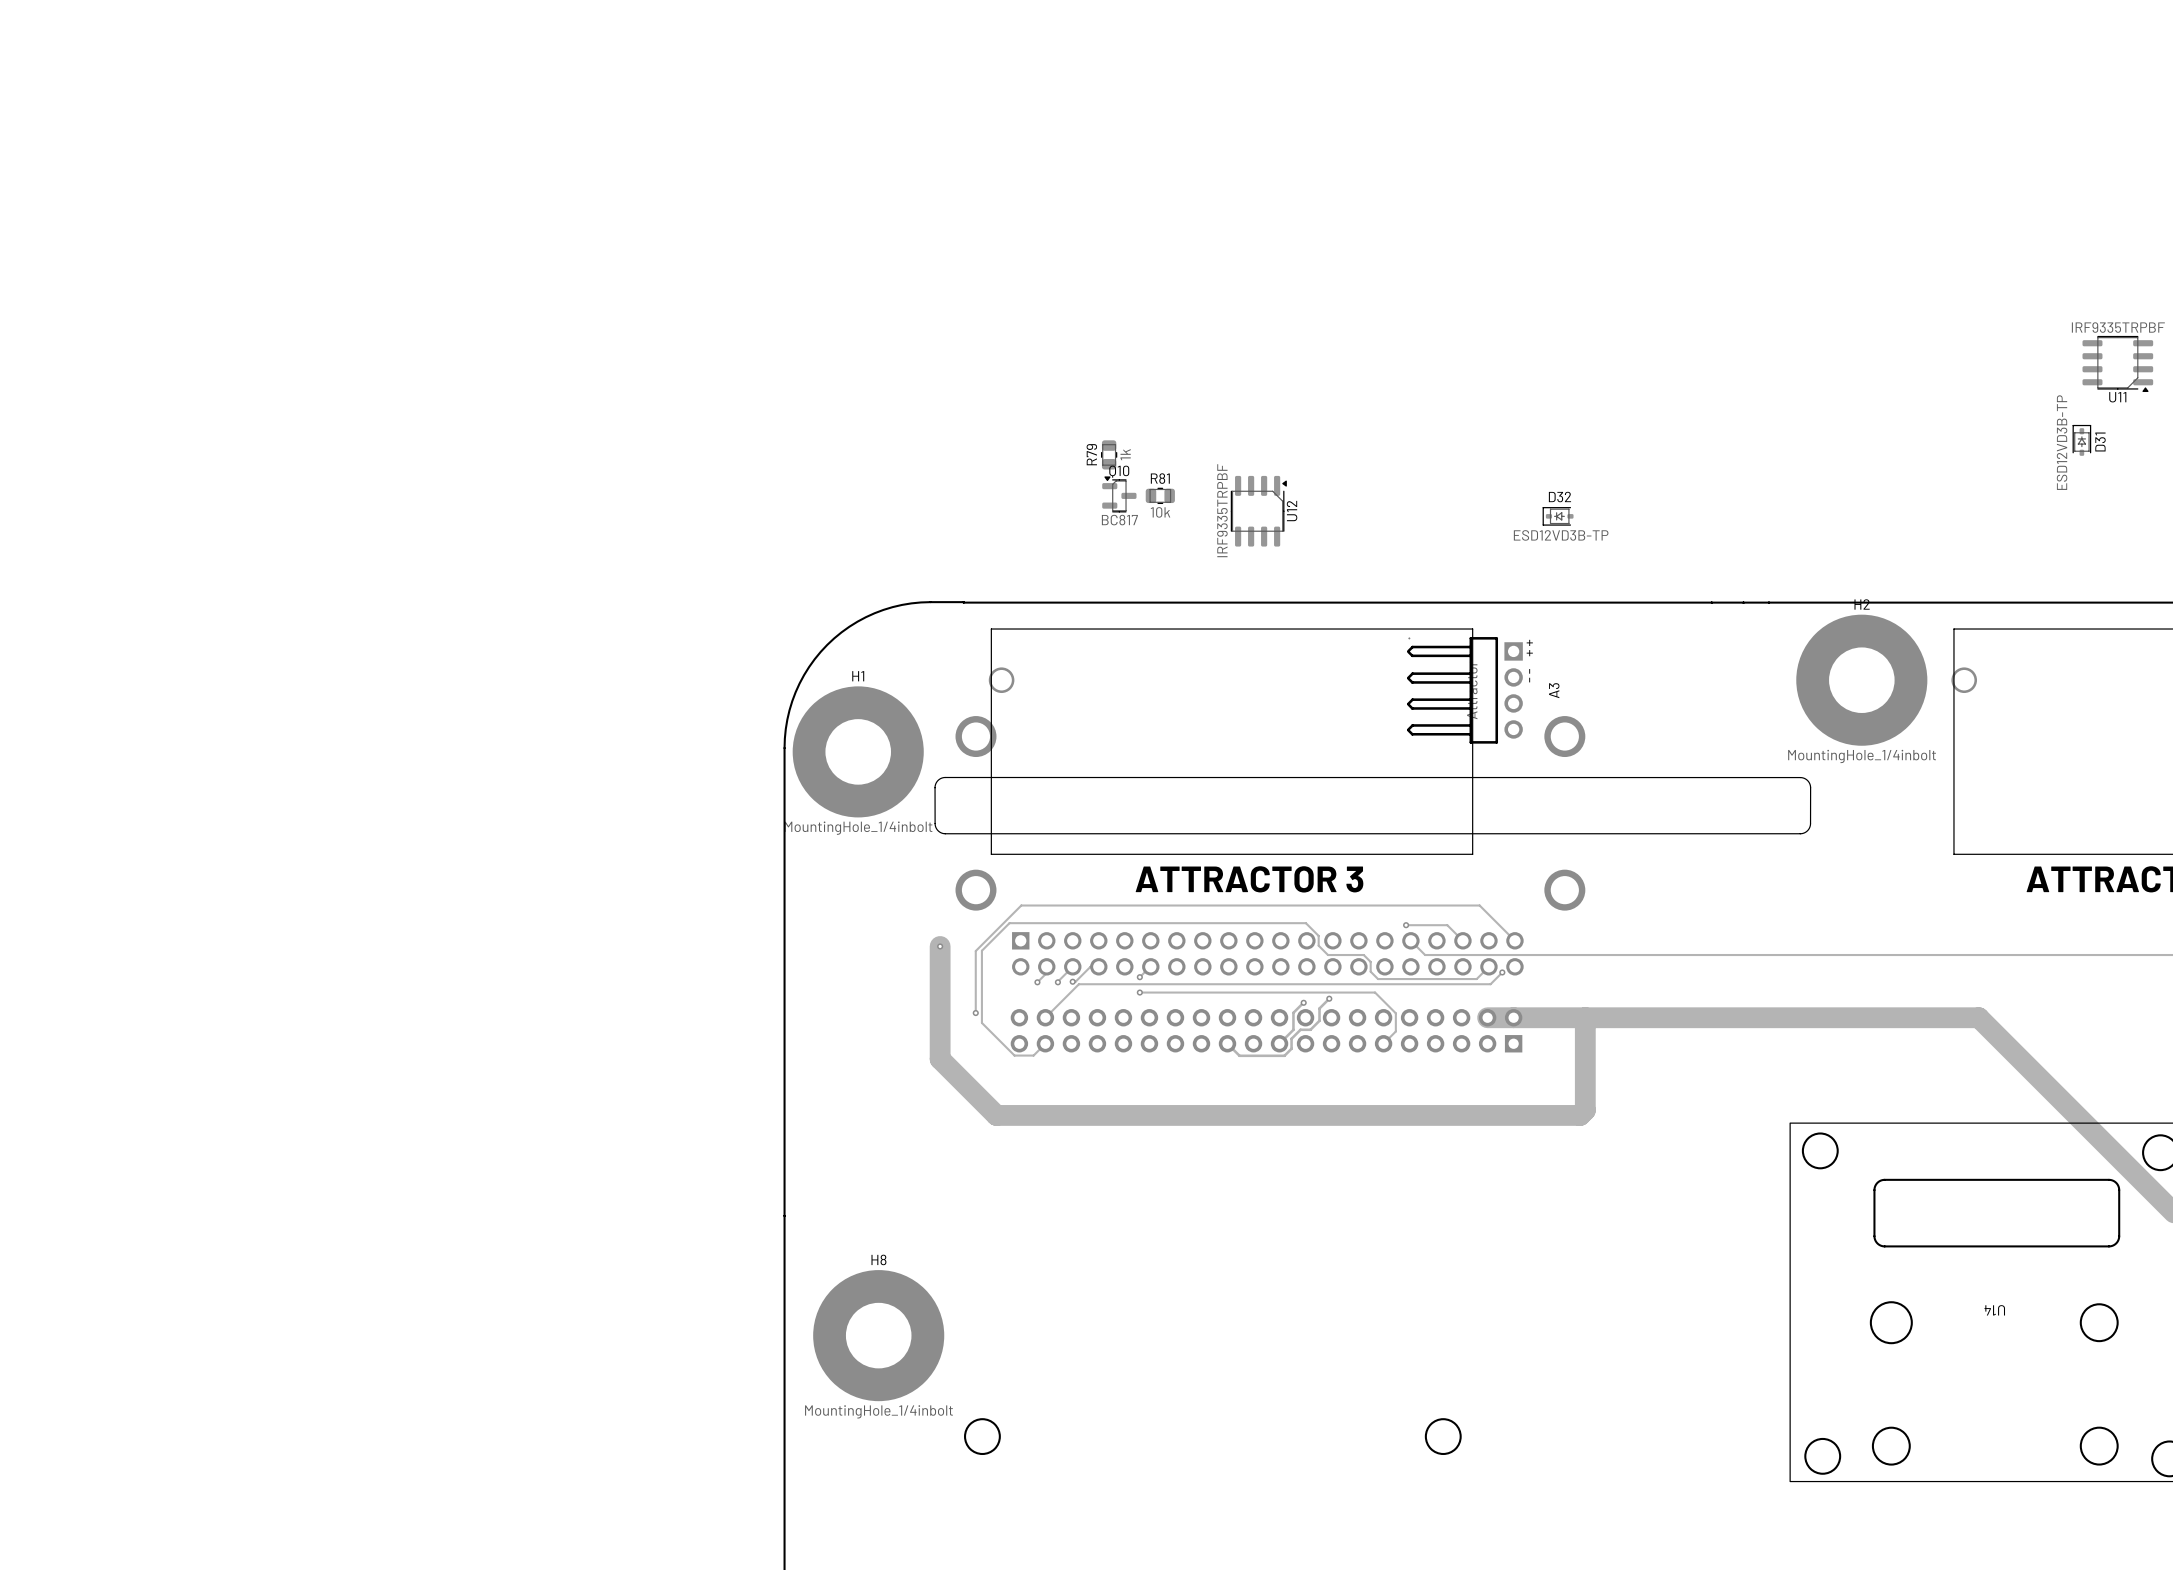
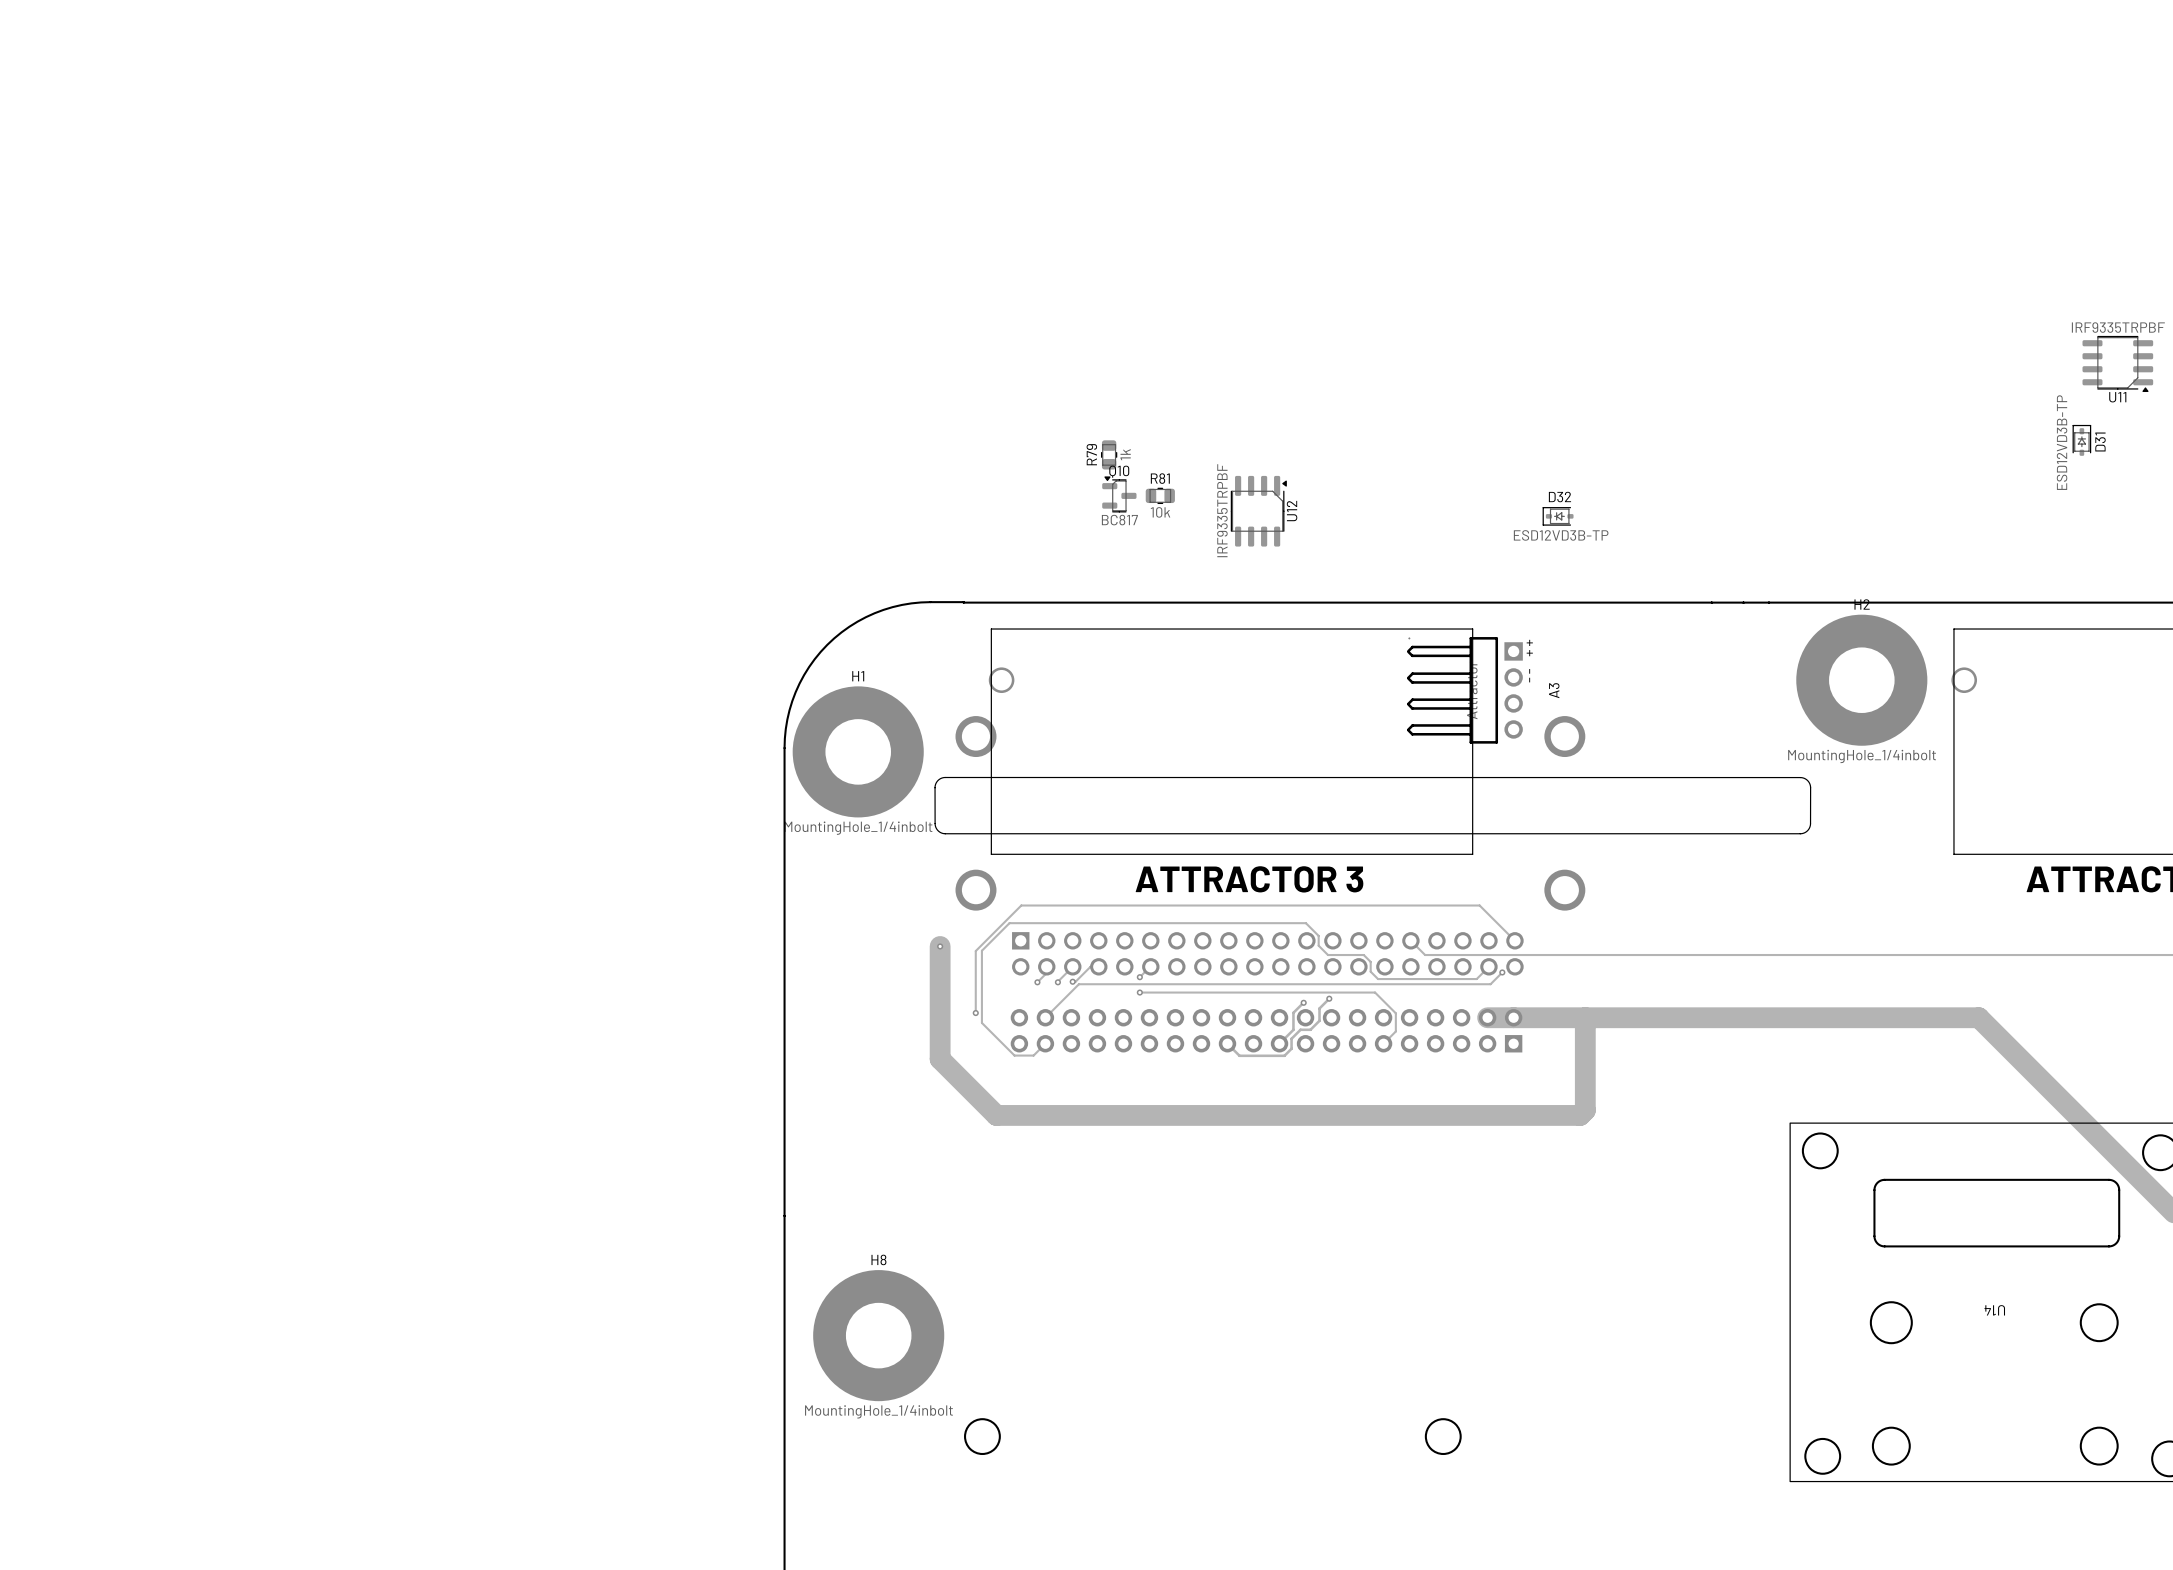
track: (1406, 925) (1447, 925) (1462, 940) -> none
via: (1406, 925) -> none

